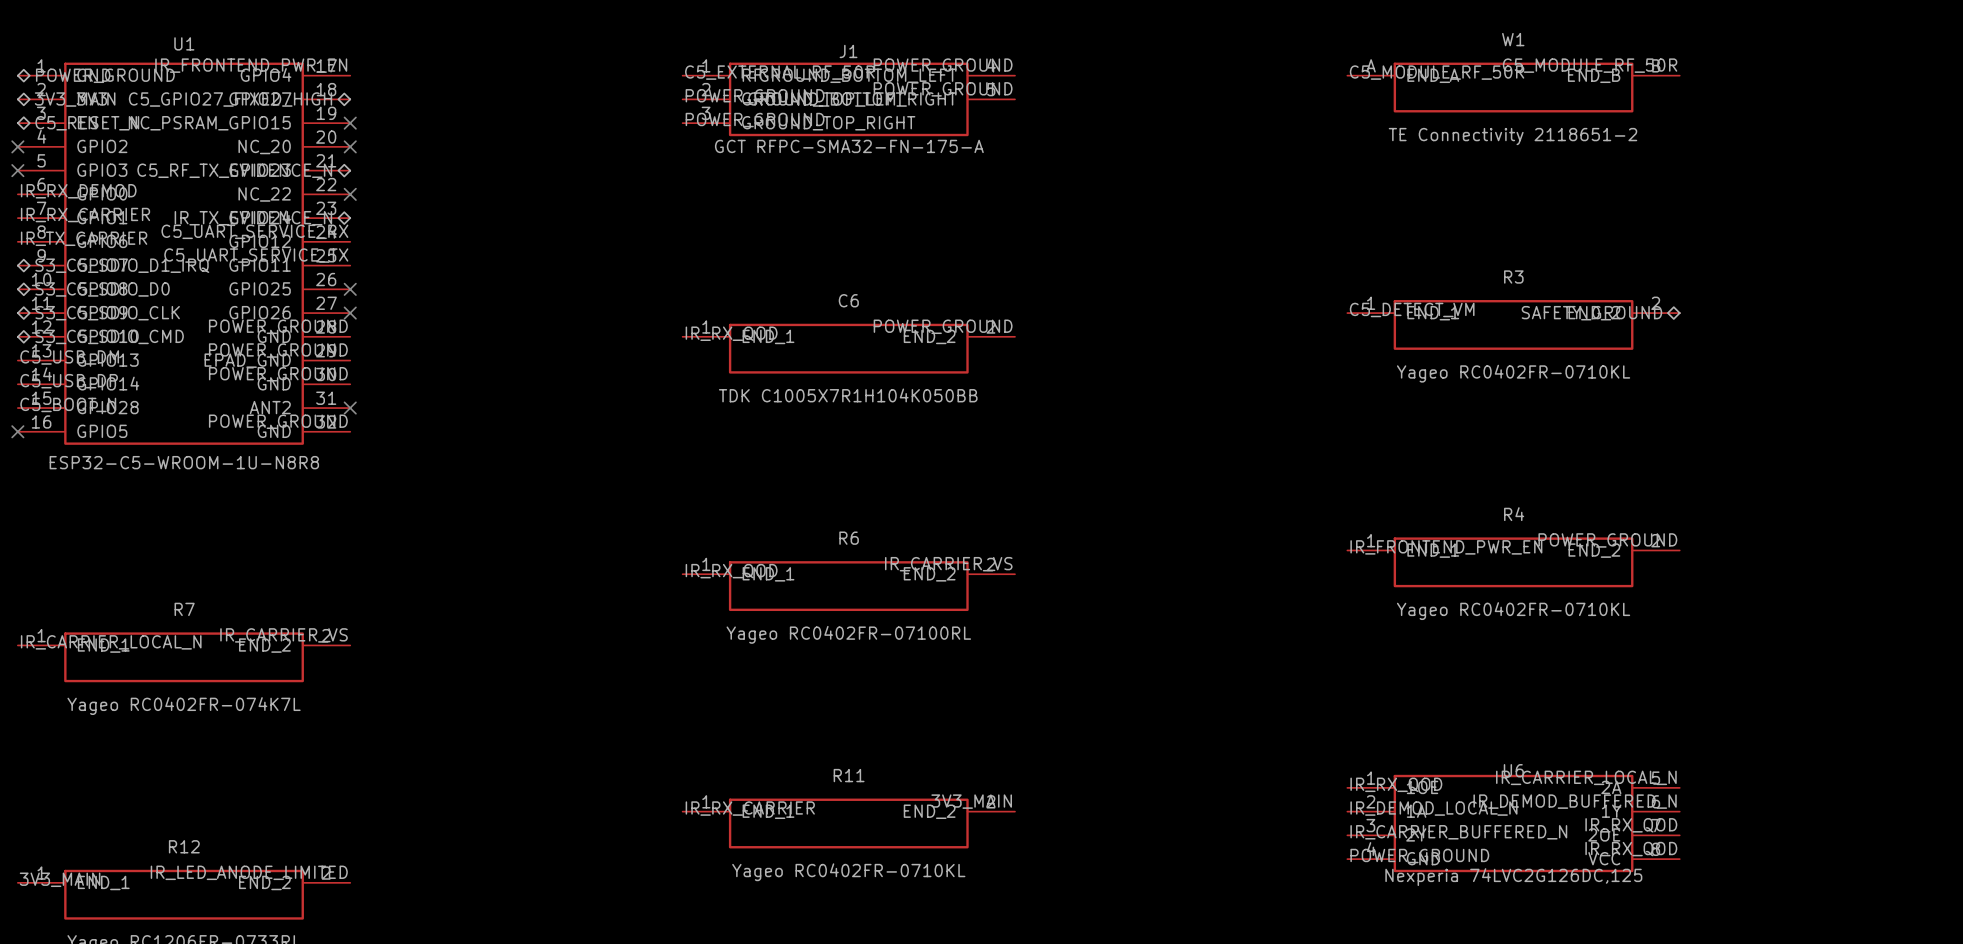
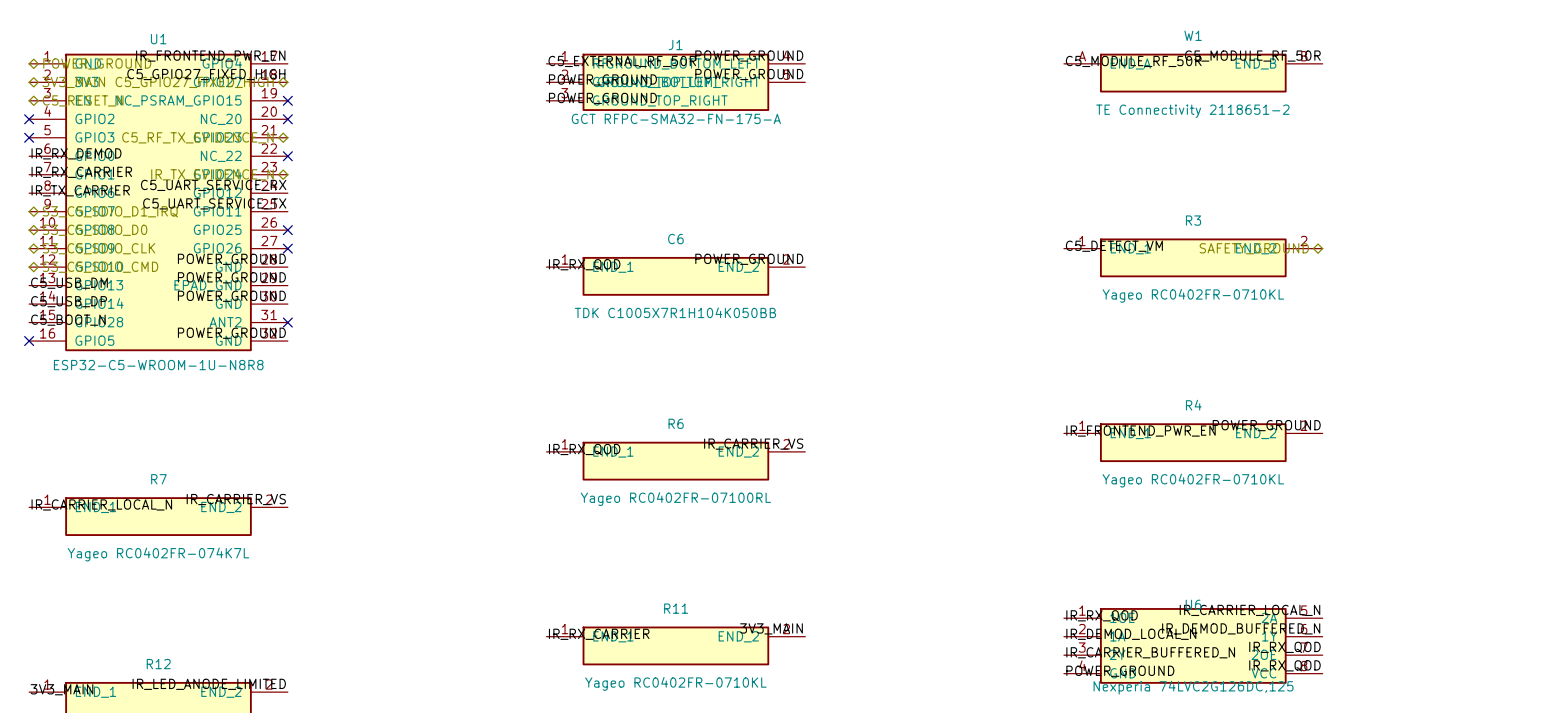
label: none -> C5_GPIO27_FIXED_HIGH (206, 74)

